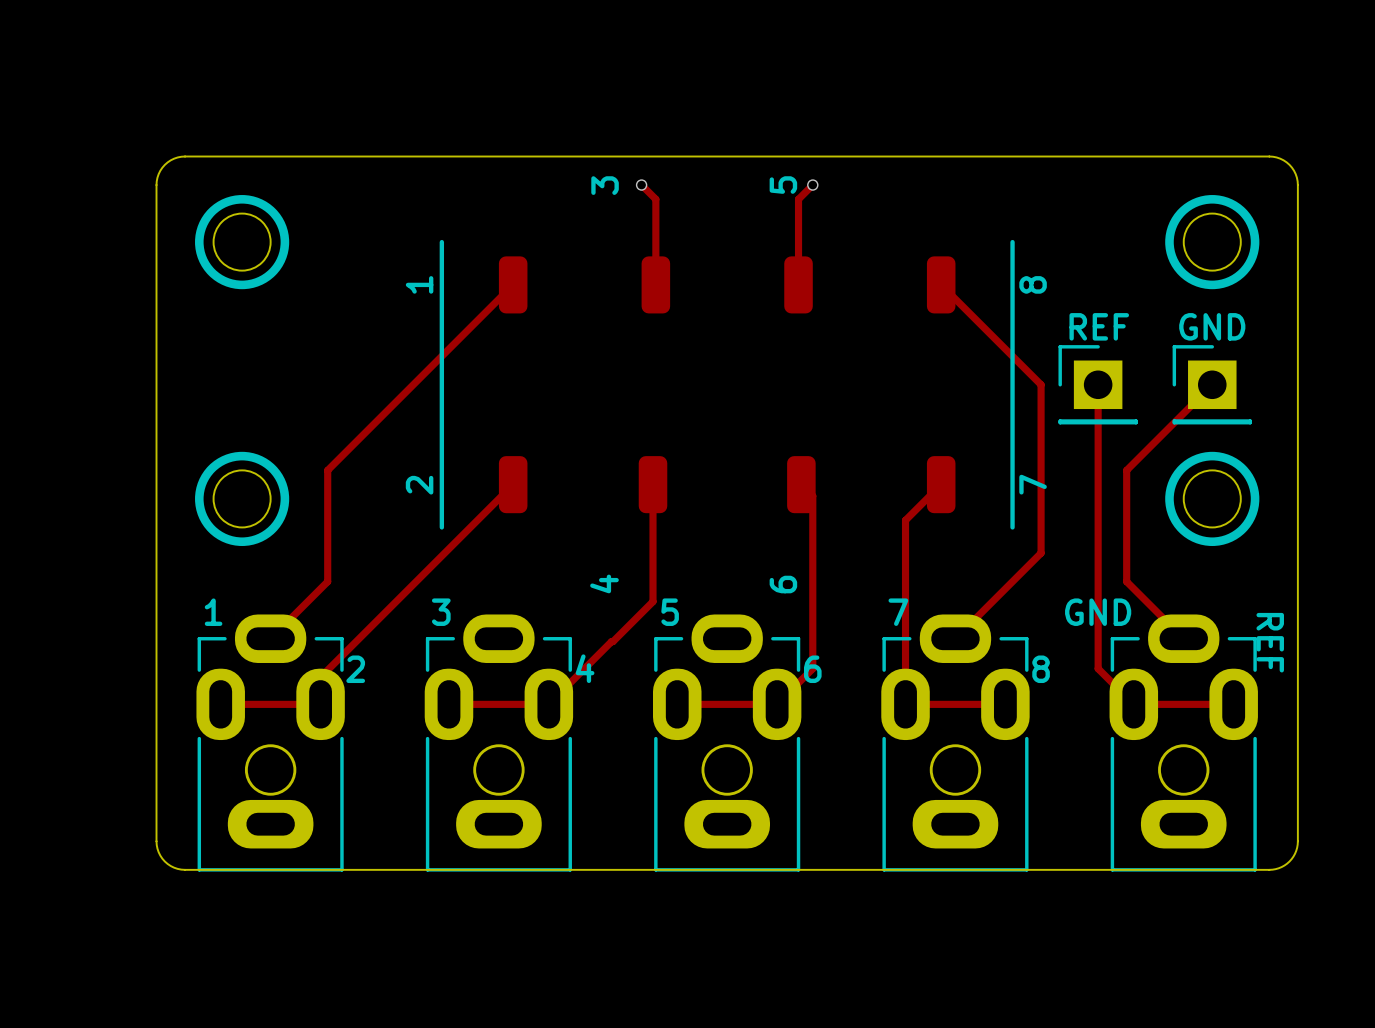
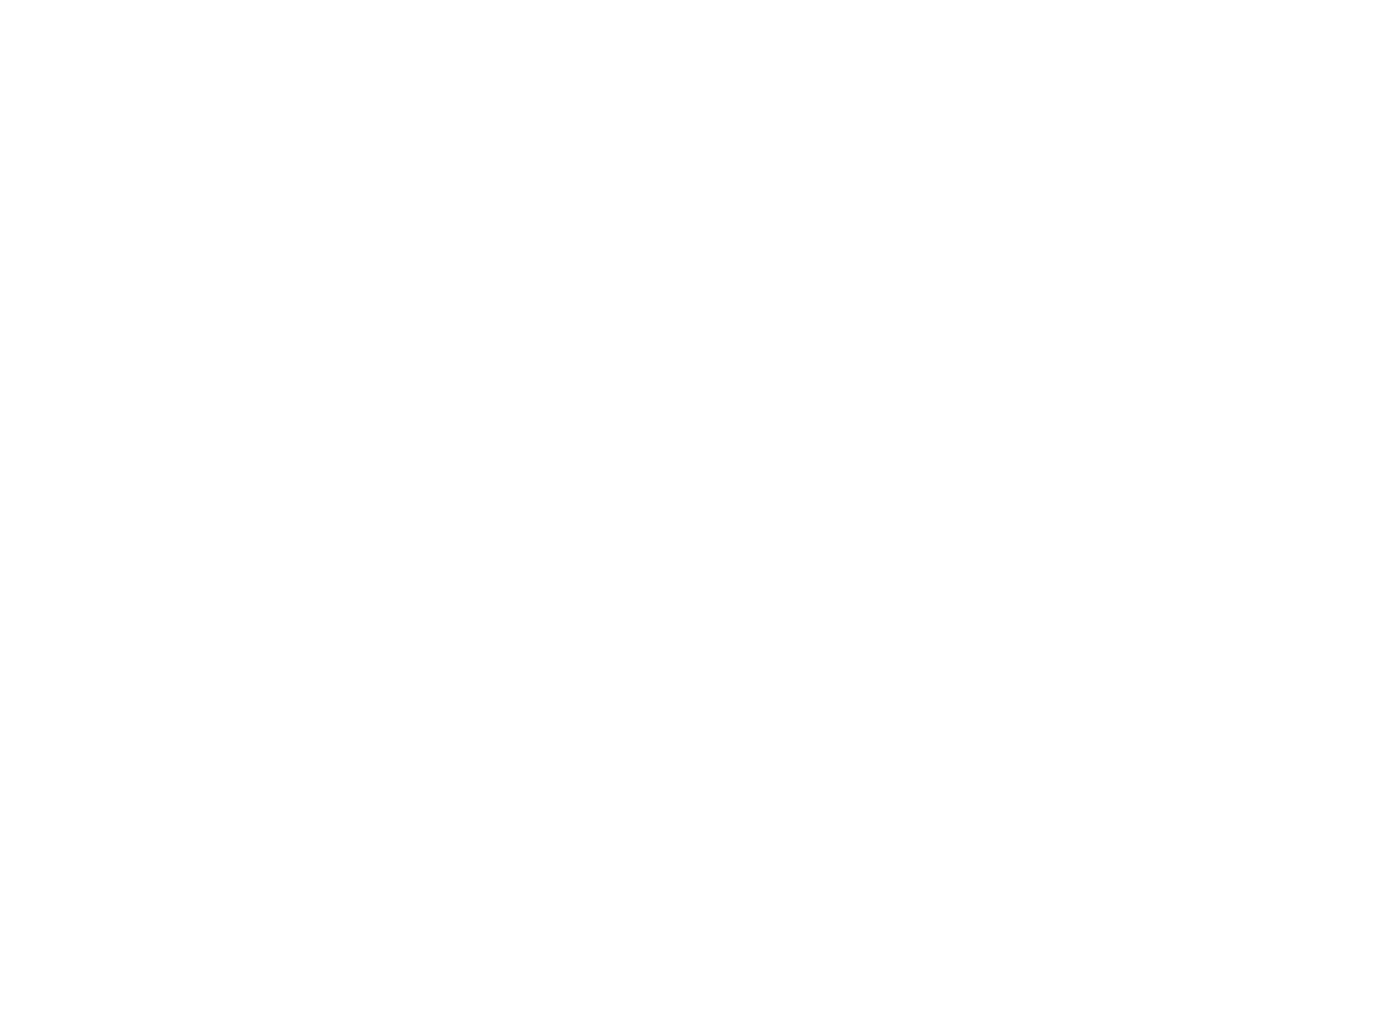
board edge: (185, 156) (1269, 156) (1283, 160) (1294, 170) (1297, 185) (1297, 841) (1293, 856) (1284, 865) (1269, 869) (185, 869) (170, 866) (160, 855) (156, 841) (156, 185) (158, 174) (164, 164) (174, 158) (185, 156) -> none
text: 3 (605, 185) -> none
track: (641, 185) (655, 199) (655, 284) -> none
via: (641, 185) -> none
text: 5 (783, 185) -> none
track: (812, 185) (798, 199) (798, 284) -> none
via: (812, 185) -> none
drawing: [195, 195, 290, 290] -> none
drawing: [1165, 195, 1260, 290] -> none
round board edge: [213, 213, 272, 272] -> none
round board edge: [1183, 213, 1242, 272] -> none
line: (441, 242) (441, 527) -> none
line: (1012, 242) (1012, 527) -> none
text: 1 (419, 284) -> none
track: (513, 284) (327, 470) (327, 581) (270, 638) -> none
part: (513, 284) -> none
part: (655, 284) -> none
part: (798, 284) -> none
track: (941, 284) (1041, 384) (1041, 553) (955, 638) -> none
part: (941, 284) -> none
text: 8 (1033, 284) -> none
text: REF (1099, 326) -> none
text: GND (1212, 326) -> none
track: (1098, 384) (1098, 668) (1133, 704) (1233, 704) -> none
part: (1098, 384) -> none
track: (1212, 384) (1126, 470) (1126, 581) (1183, 638) -> none
part: (1212, 384) -> none
drawing: [195, 451, 290, 546] -> none
drawing: [1165, 451, 1260, 546] -> none
round board edge: [213, 469, 272, 528] -> none
round board edge: [1183, 469, 1242, 528] -> none
track: (513, 484) (320, 677) (320, 704) (220, 704) -> none
part: (513, 484) -> none
track: (653, 484) (653, 601) (548, 704) (448, 704) -> none
part: (653, 484) -> none
track: (801, 484) (812, 496) (812, 668) (777, 704) (677, 704) -> none
part: (801, 484) -> none
track: (941, 484) (905, 520) (905, 704) (1005, 704) -> none
part: (941, 484) -> none
text: 7 (1033, 484) -> none
text: 2 (419, 485) -> none
text: 4 (604, 583) -> none
text: 6 (783, 584) -> none
text: 1 (213, 612) -> none
text: 3 (441, 612) -> none
text: 5 (670, 612) -> none
text: 7 (898, 612) -> none
text: GND (1098, 612) -> none
text: REF (1270, 642) -> none
text: 4 (585, 668) -> none
text: 2 (355, 669) -> none
text: 6 (812, 669) -> none
text: 8 (1041, 669) -> none
part: (270, 743) -> none
part: (498, 743) -> none
part: (727, 743) -> none
part: (955, 743) -> none
part: (1183, 743) -> none

